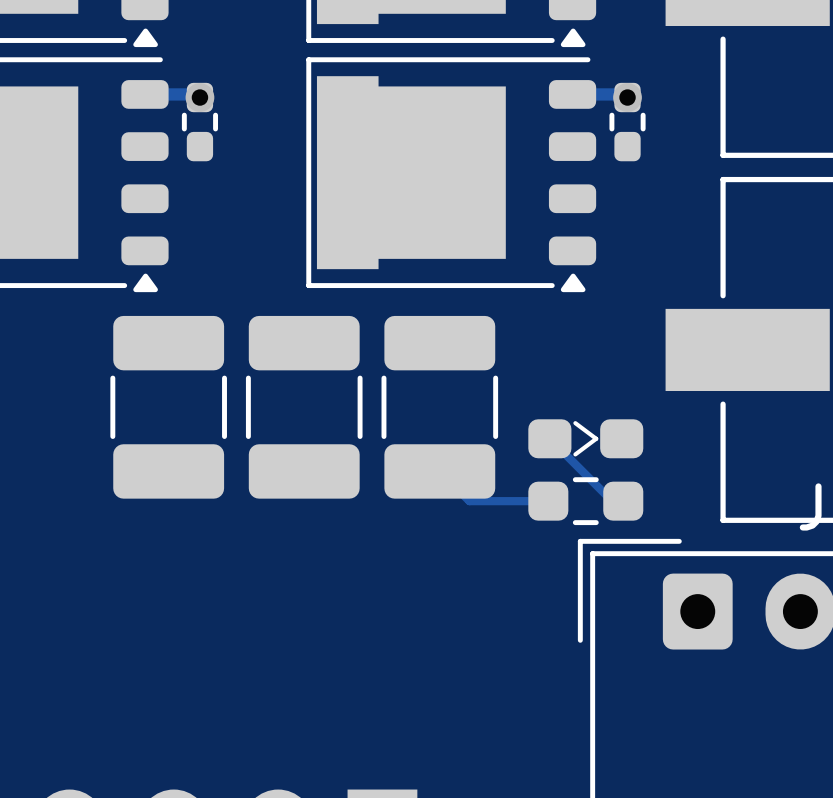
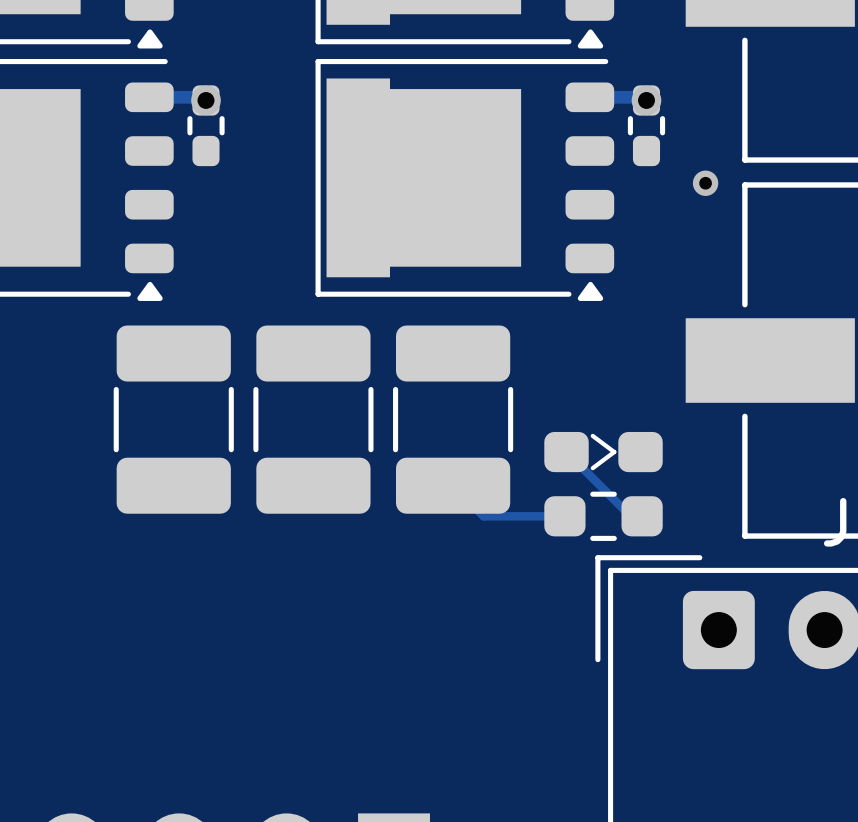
via: none -> (705, 183)

